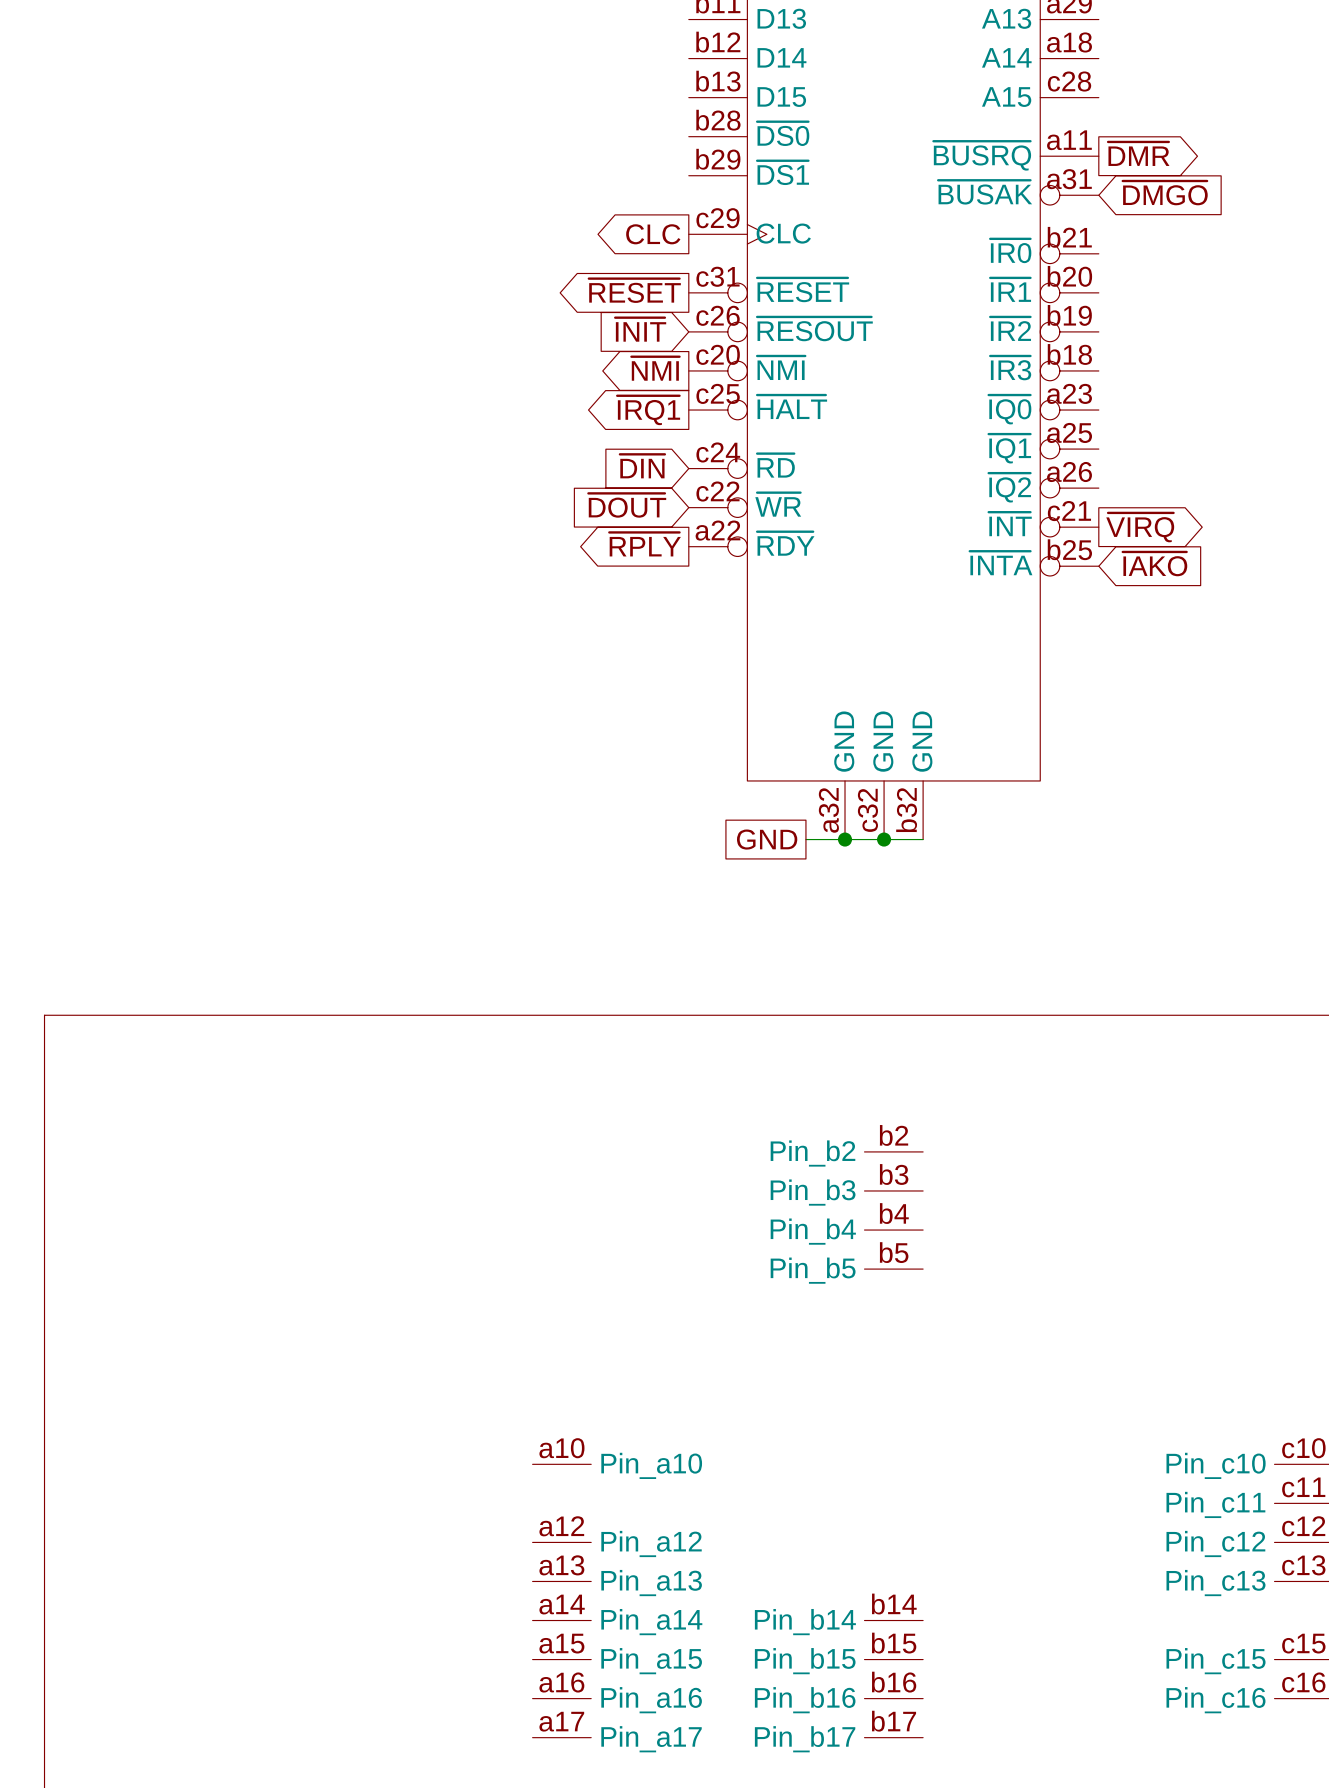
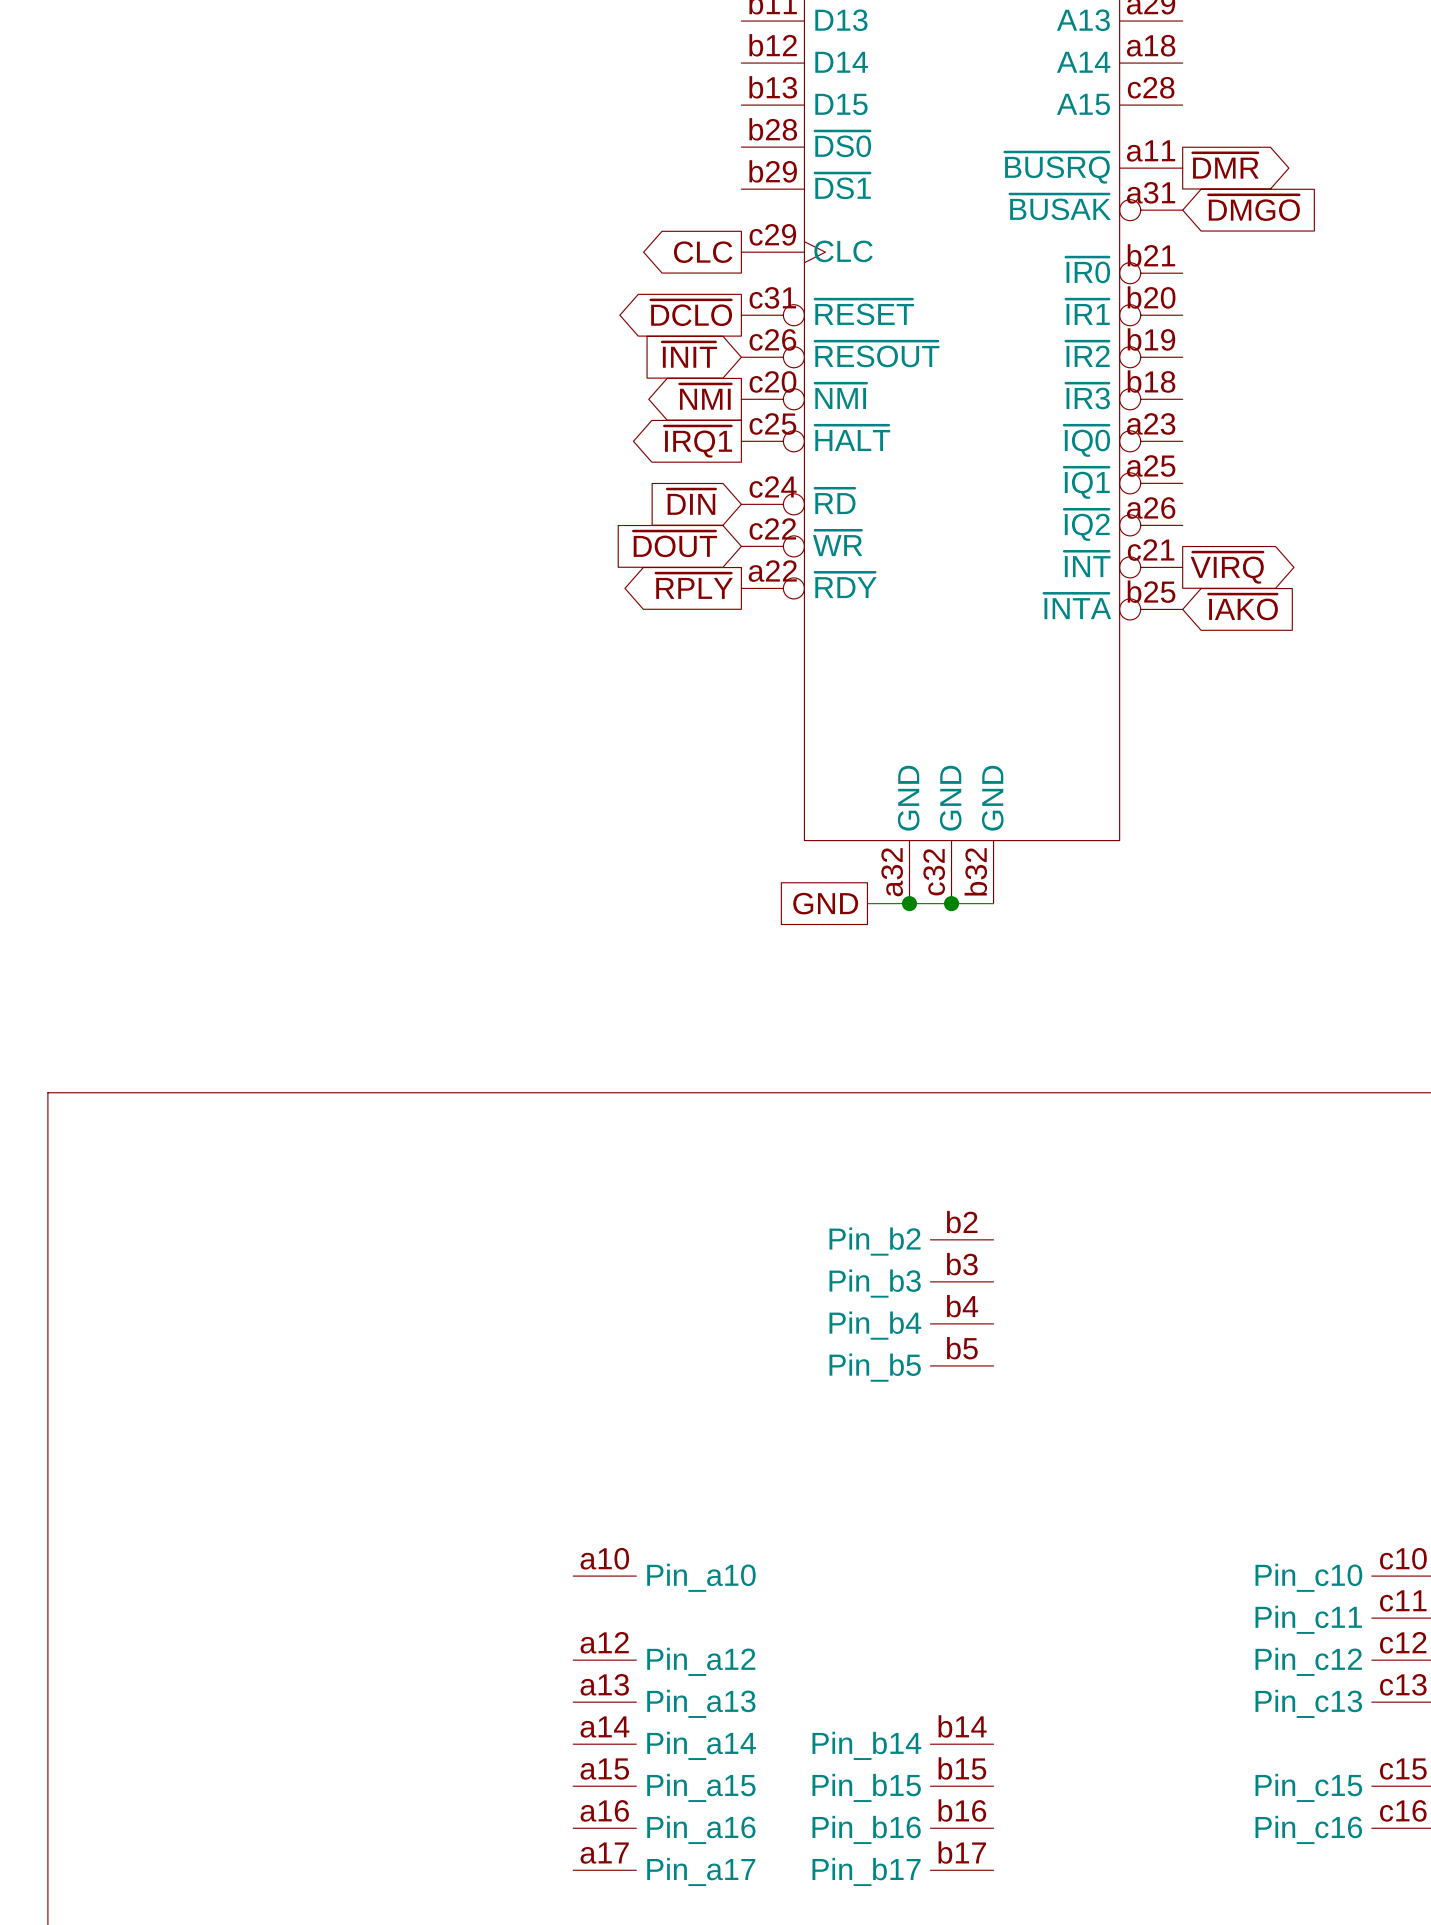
global label: ~{RESET} (634, 290) -> ~{DCLO} (691, 312)

